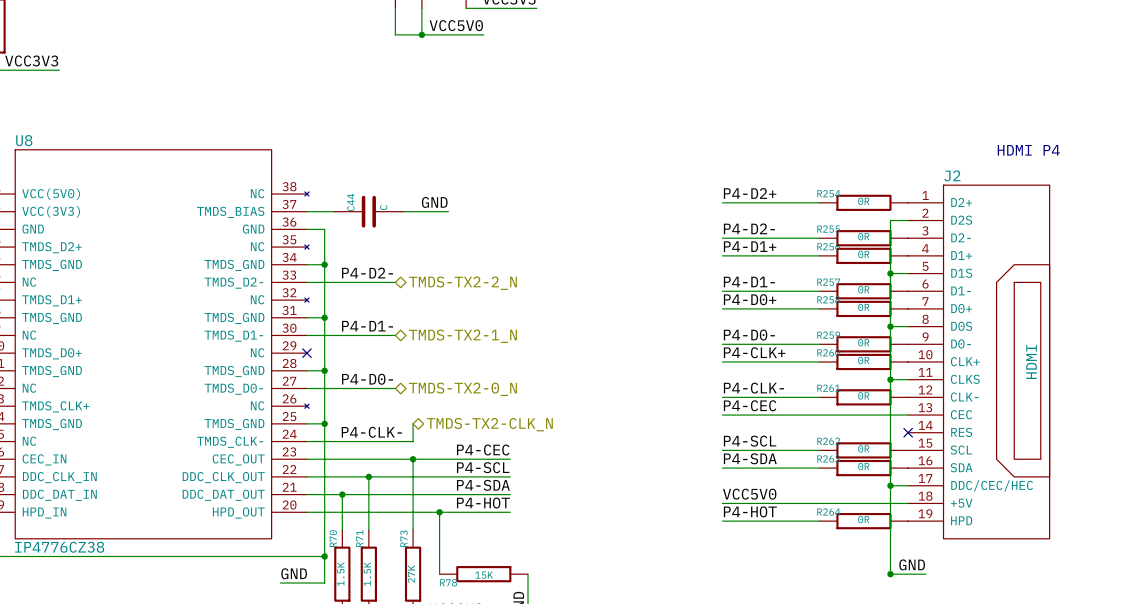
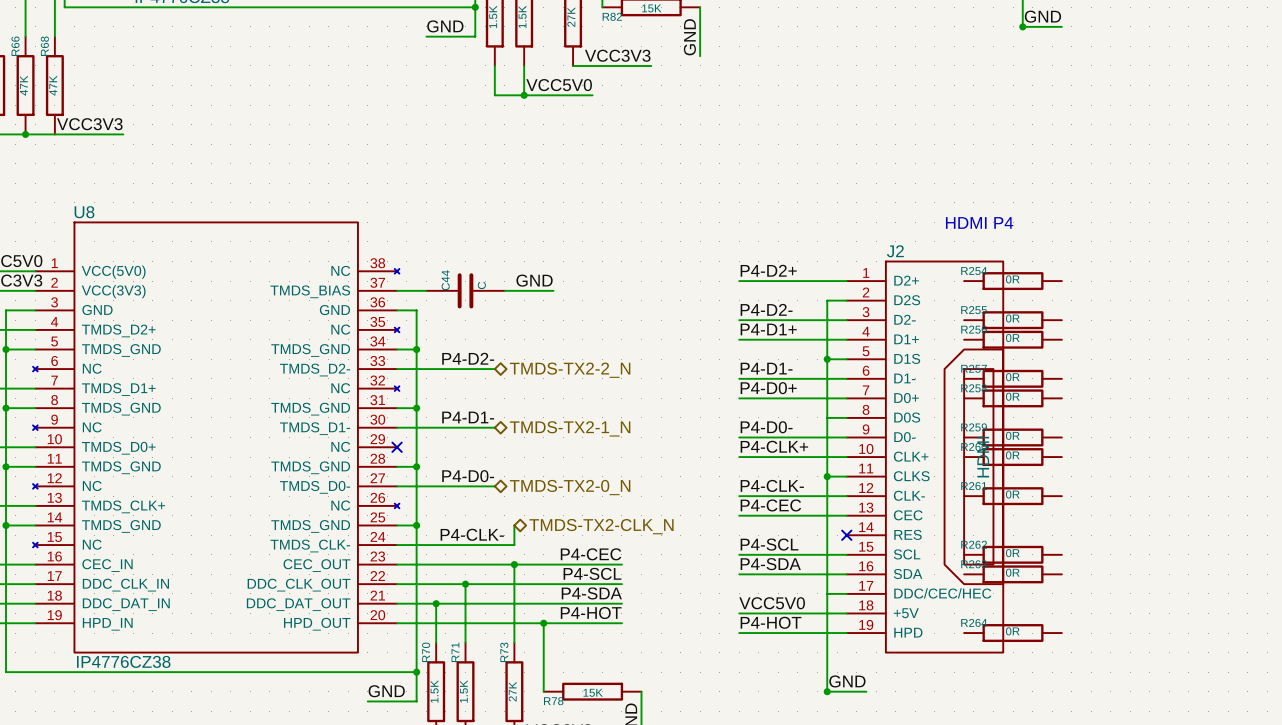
text: none -> HDMI P4 (979, 222)
text: HDMI P4 (1028, 150) -> none
label position: P4-D2+ (750, 193) -> P4-D2+ (768, 270)
wire: (722, 202) (819, 202) -> (739, 281) (846, 281)
wire: none -> (846, 300) (827, 300) (827, 691) (866, 691)
wire: (908, 220) (890, 220) (890, 574) (925, 574) -> none
label position: P4-D2- (749, 228) -> P4-D2- (766, 309)
wire: (722, 238) (819, 238) -> (739, 320) (846, 320)
label position: P4-D1+ (750, 246) -> P4-D1+ (768, 329)
wire: (722, 255) (819, 255) -> (739, 339) (846, 339)
wire: none -> (827, 359) (846, 359)
junction: none -> (827, 359)
wire: (890, 273) (908, 273) -> none
junction: (890, 273) -> none
label position: P4-D1- (749, 282) -> P4-D1- (766, 368)
wire: (722, 291) (819, 291) -> (739, 378) (846, 378)
label position: P4-D0+ (750, 299) -> P4-D0+ (768, 388)
wire: (722, 308) (819, 308) -> (739, 398) (846, 398)
wire: none -> (827, 417) (846, 417)
wire: (890, 326) (908, 326) -> none
junction: (890, 326) -> none
label position: P4-D0- (749, 335) -> P4-D0- (766, 427)
wire: (722, 344) (819, 344) -> (739, 437) (846, 437)
label position: P4-CLK+ (754, 352) -> P4-CLK+ (774, 446)
wire: (722, 361) (819, 361) -> (739, 457) (846, 457)
J2 position: (978, 361) -> (925, 457)
wire: none -> (827, 476) (846, 476)
junction: none -> (827, 476)
wire: (890, 379) (908, 379) -> none
junction: (890, 379) -> none
label position: P4-CLK- (753, 388) -> P4-CLK- (772, 485)
wire: (722, 397) (819, 397) -> (739, 496) (846, 496)
label position: P4-CEC (750, 405) -> P4-CEC (770, 505)
wire: none -> (739, 515) (846, 515)
wire: (722, 415) (908, 415) -> none
no-connect mark: none -> (846, 535)
no-connect mark: (908, 432) -> none
label position: P4-SCL (750, 441) -> P4-SCL (769, 544)
wire: (722, 450) (819, 450) -> (739, 554) (846, 554)
label position: P4-SDA (750, 458) -> P4-SDA (770, 564)
wire: (722, 468) (819, 468) -> (739, 574) (846, 574)
wire: none -> (827, 593) (846, 593)
wire: (890, 485) (908, 485) -> none
junction: (890, 485) -> none
label position: VCC5V0 (749, 494) -> VCC5V0 (772, 603)
wire: none -> (739, 613) (846, 613)
wire: (722, 503) (908, 503) -> none
label position: P4-HOT (750, 511) -> P4-HOT (771, 622)
wire: (722, 521) (819, 521) -> (739, 633) (846, 633)
label: none -> GND (847, 681)
label: GND (912, 564) -> none
junction: none -> (827, 691)
junction: (890, 574) -> none

